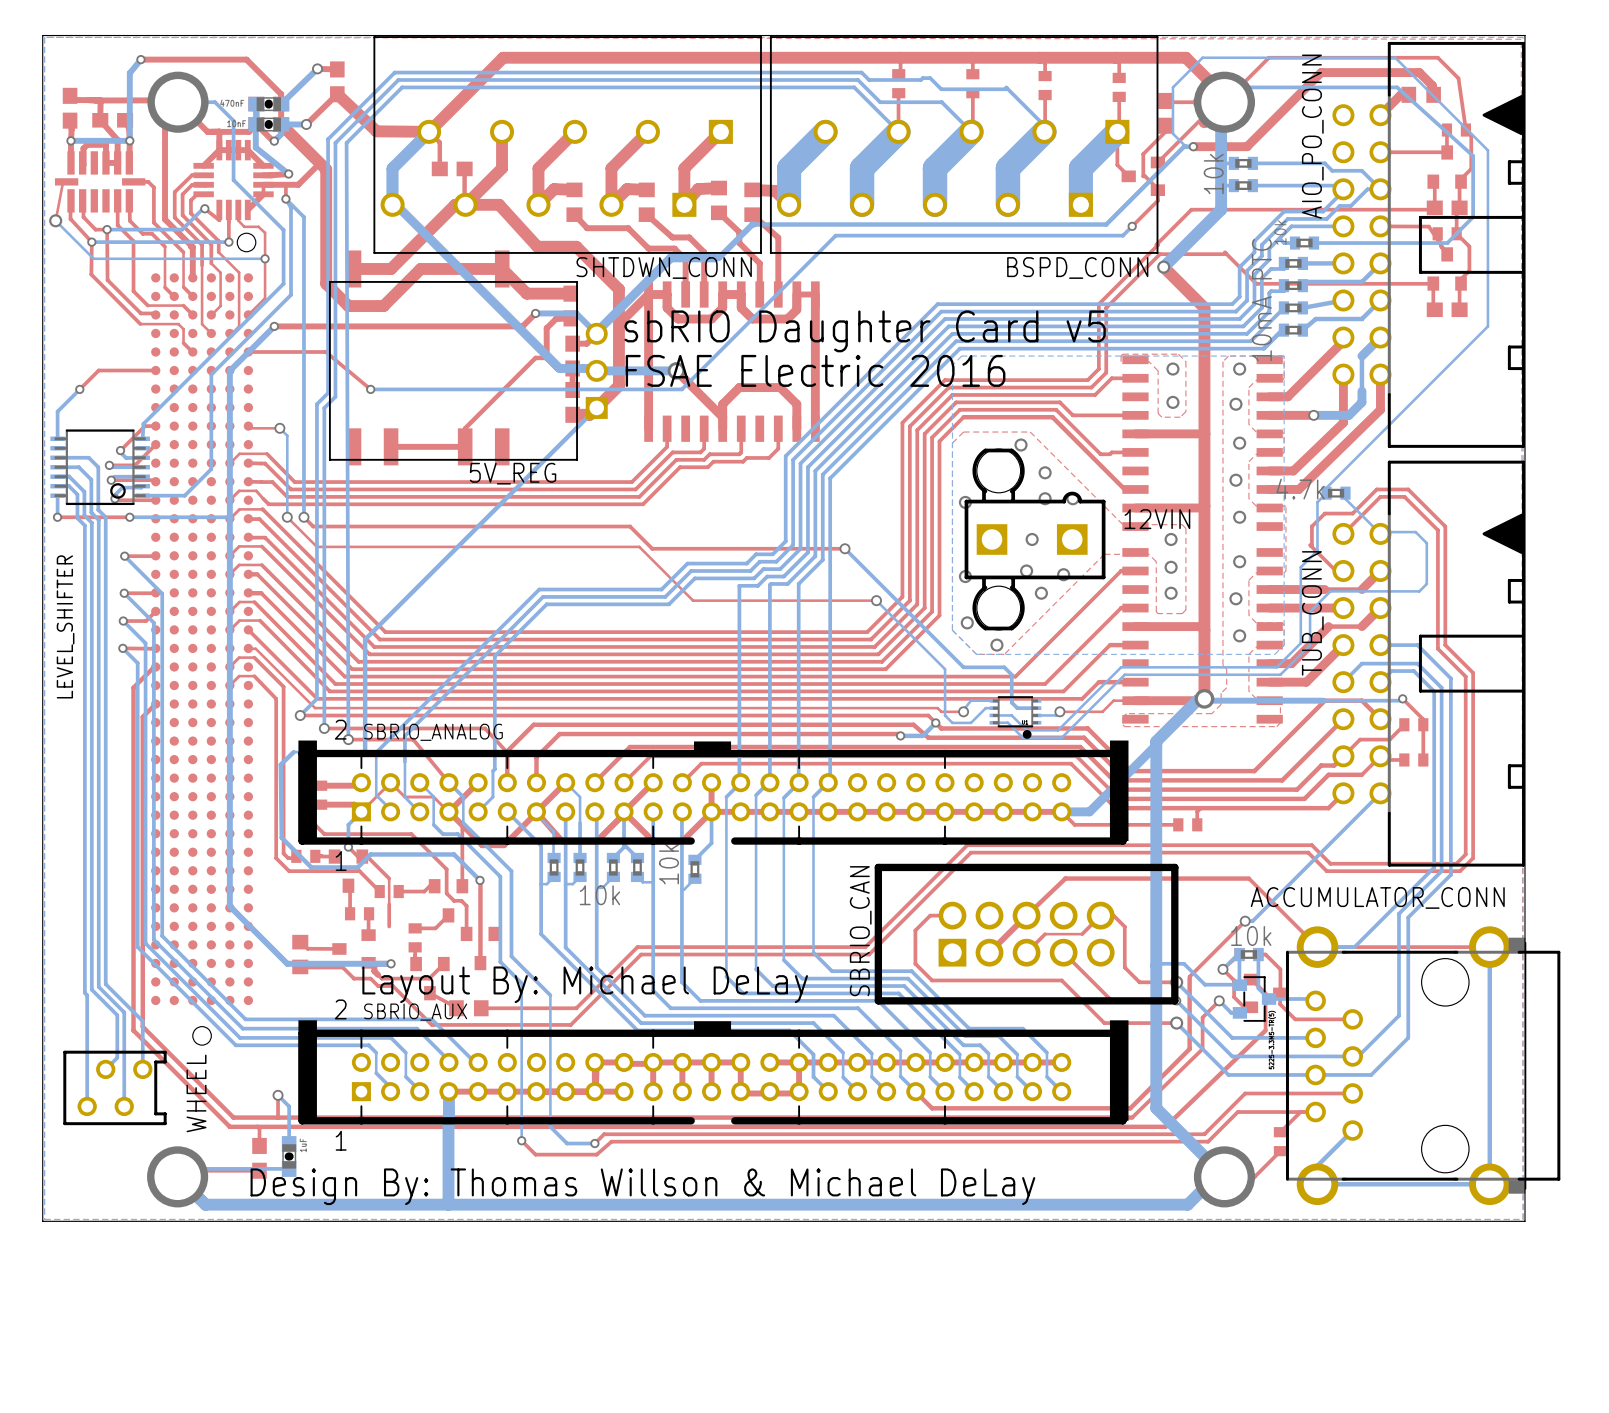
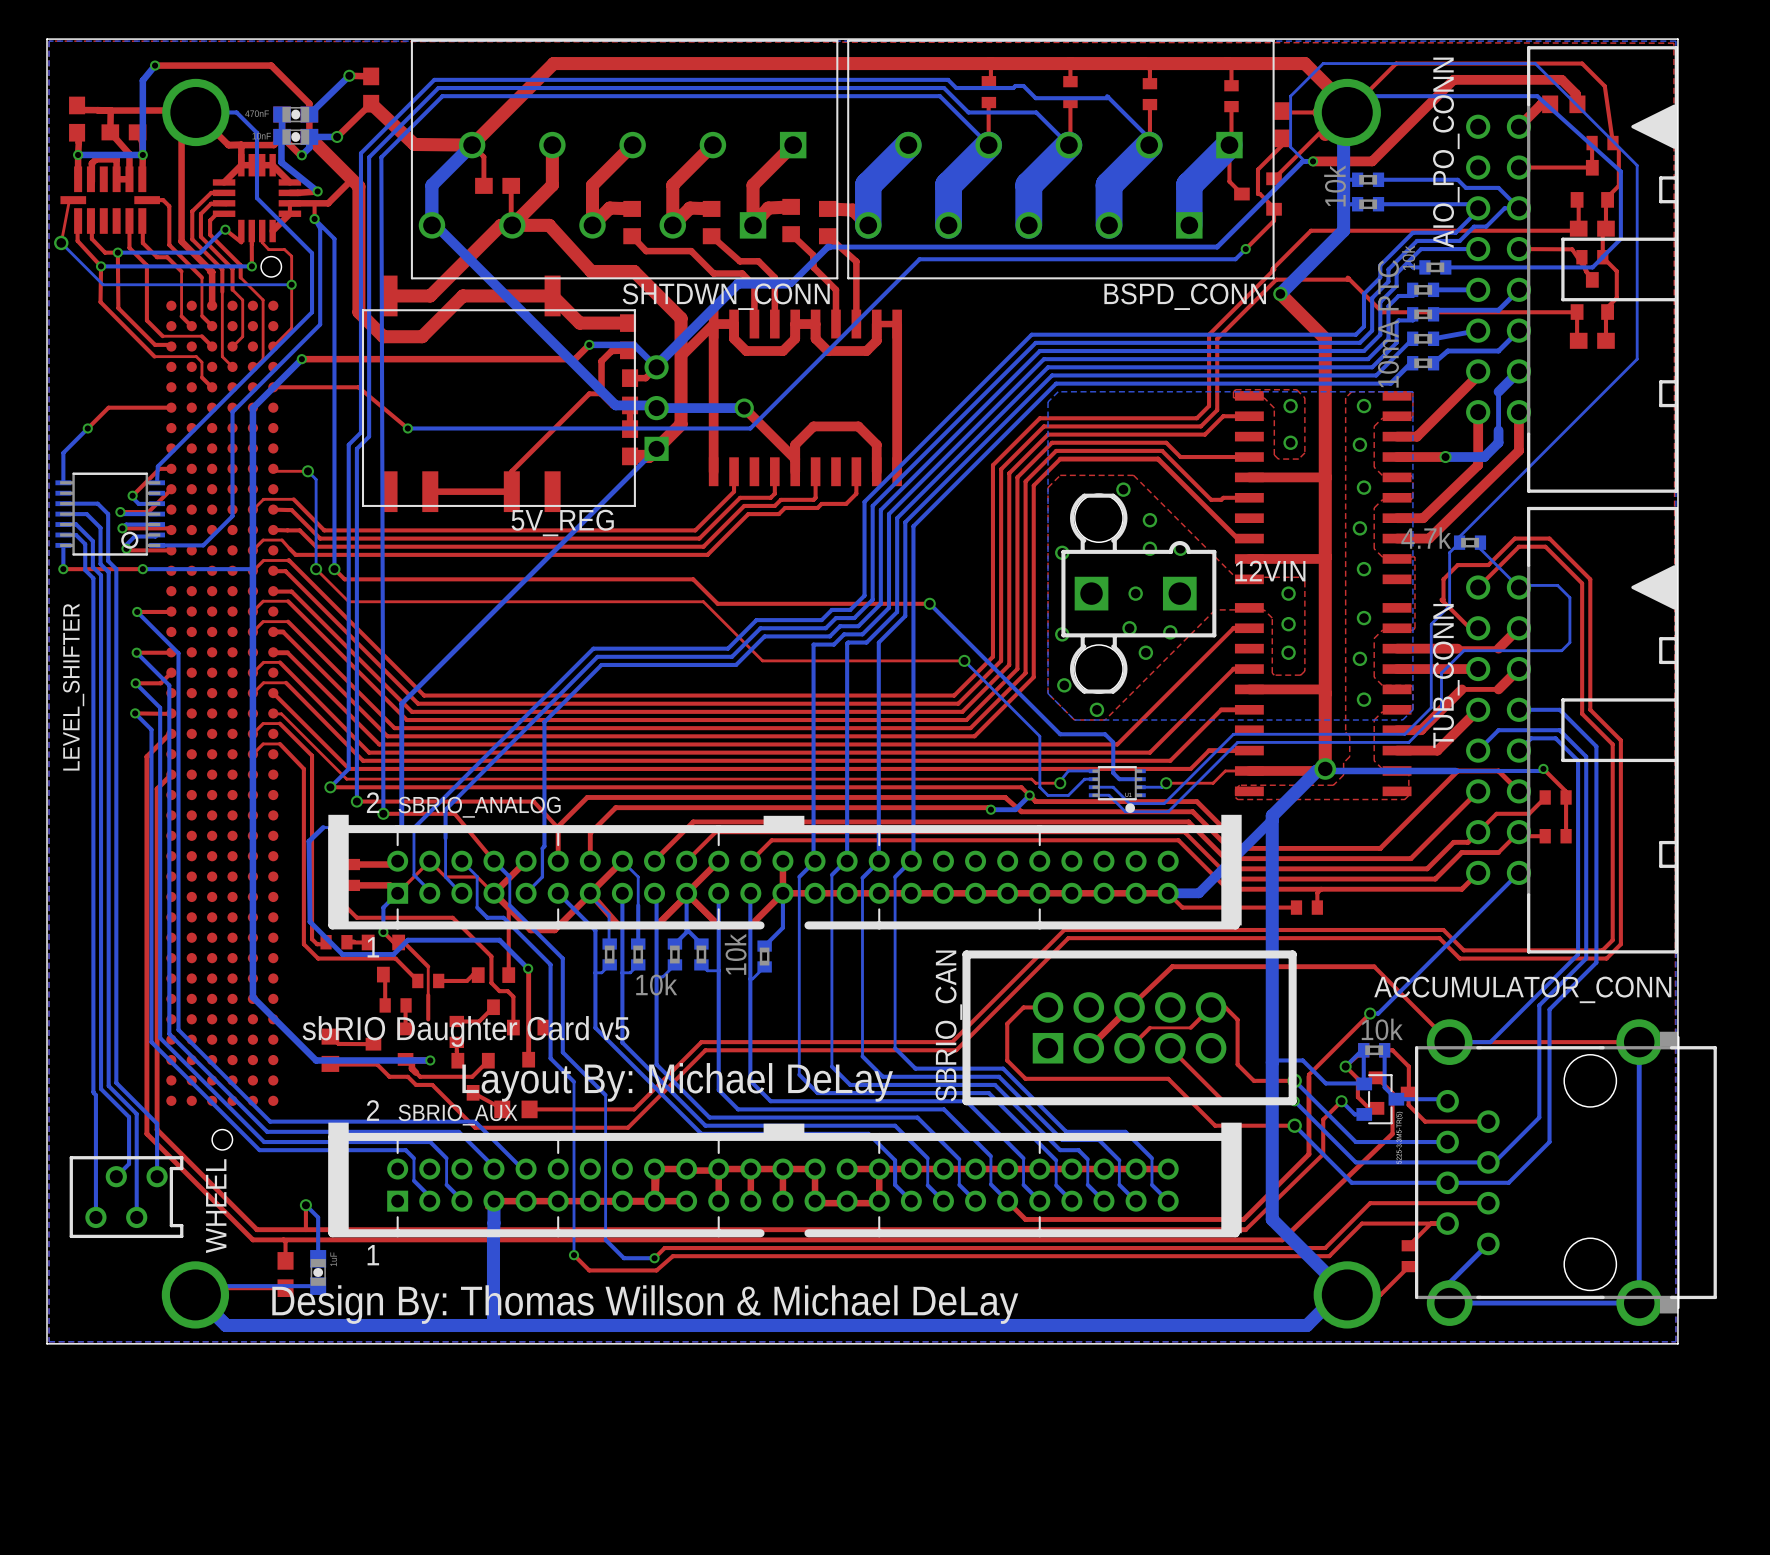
text: sbRIO Daughter Card v5 (865, 331) -> none
text: FSAE Electric 2016 (815, 370) -> none
text: none -> sbRIO Daughter Card v5 (465, 1031)

